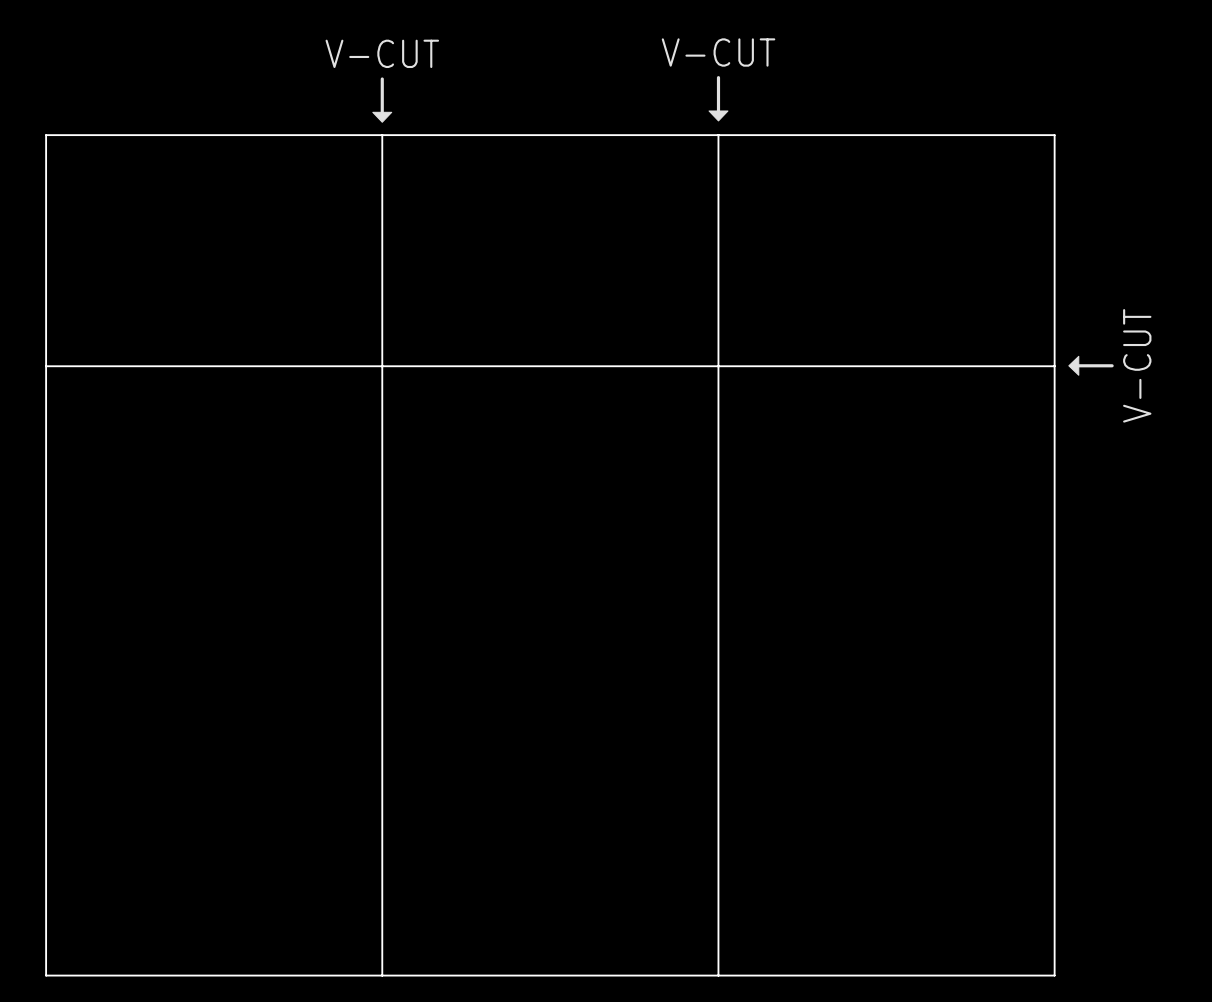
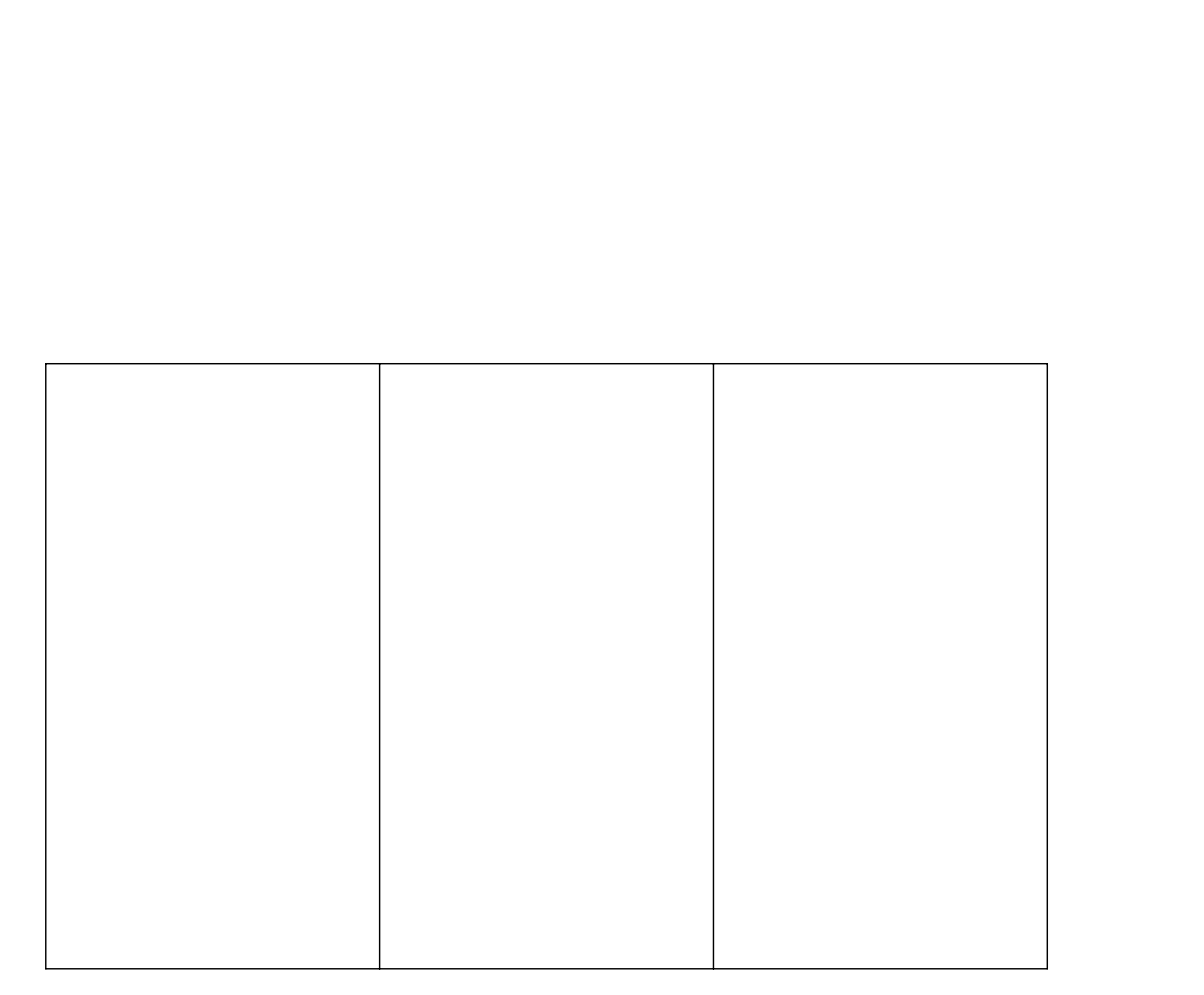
text: V-CUT (718, 52) -> none
text: V-CUT (382, 53) -> none
line: (718, 77) (718, 115) -> none
line: (382, 78) (382, 116) -> none
drawing: [708, 110, 729, 122] -> none
drawing: [372, 111, 393, 123] -> none
board edge: (382, 135) (382, 366) -> none
board edge: (718, 135) (718, 366) -> none
drawing: [1068, 355, 1080, 376] -> none
line: (1074, 365) (1112, 365) -> none
text: V-CUT (1137, 365) -> none
board edge: (46, 366) (46, 135) (1054, 135) (1054, 366) -> none

